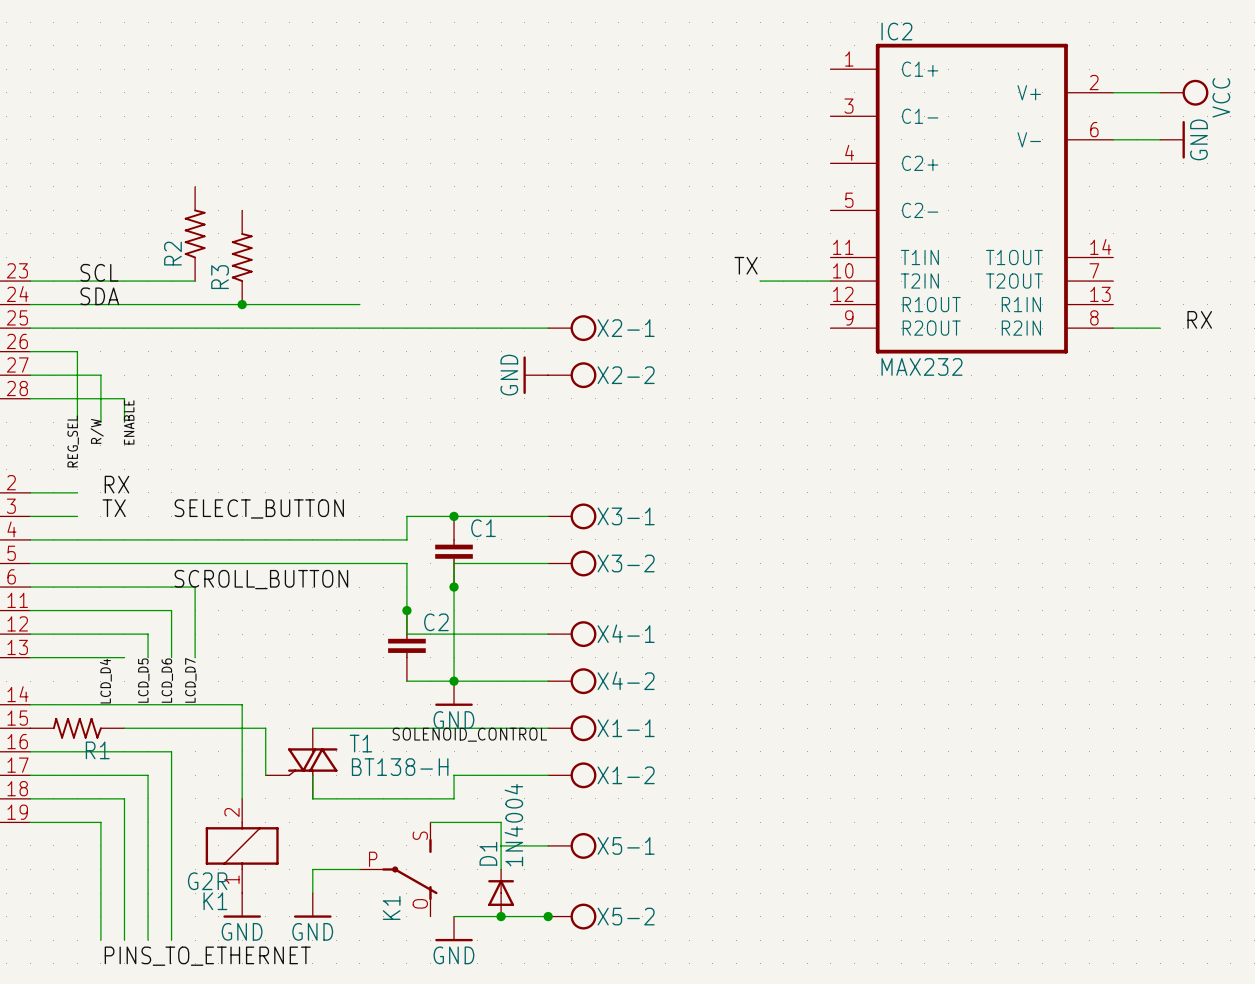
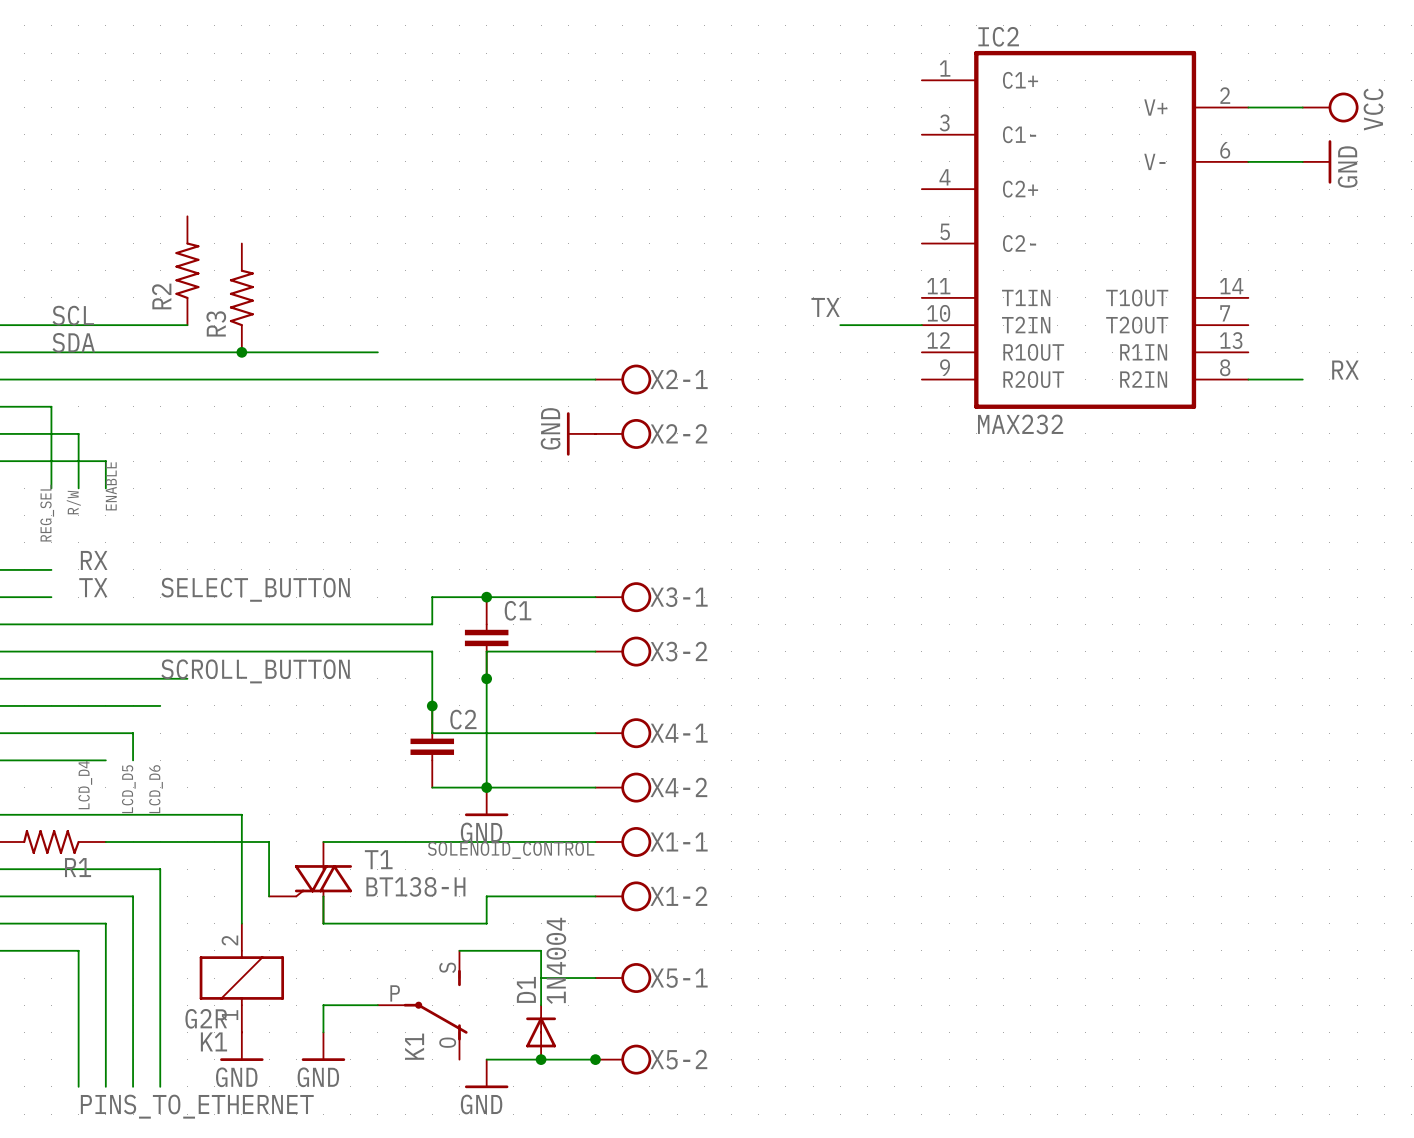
wire: (195, 587) (195, 657) -> none
wire: (171, 610) (171, 657) -> none
label: LCD_D7 (190, 680) -> none

